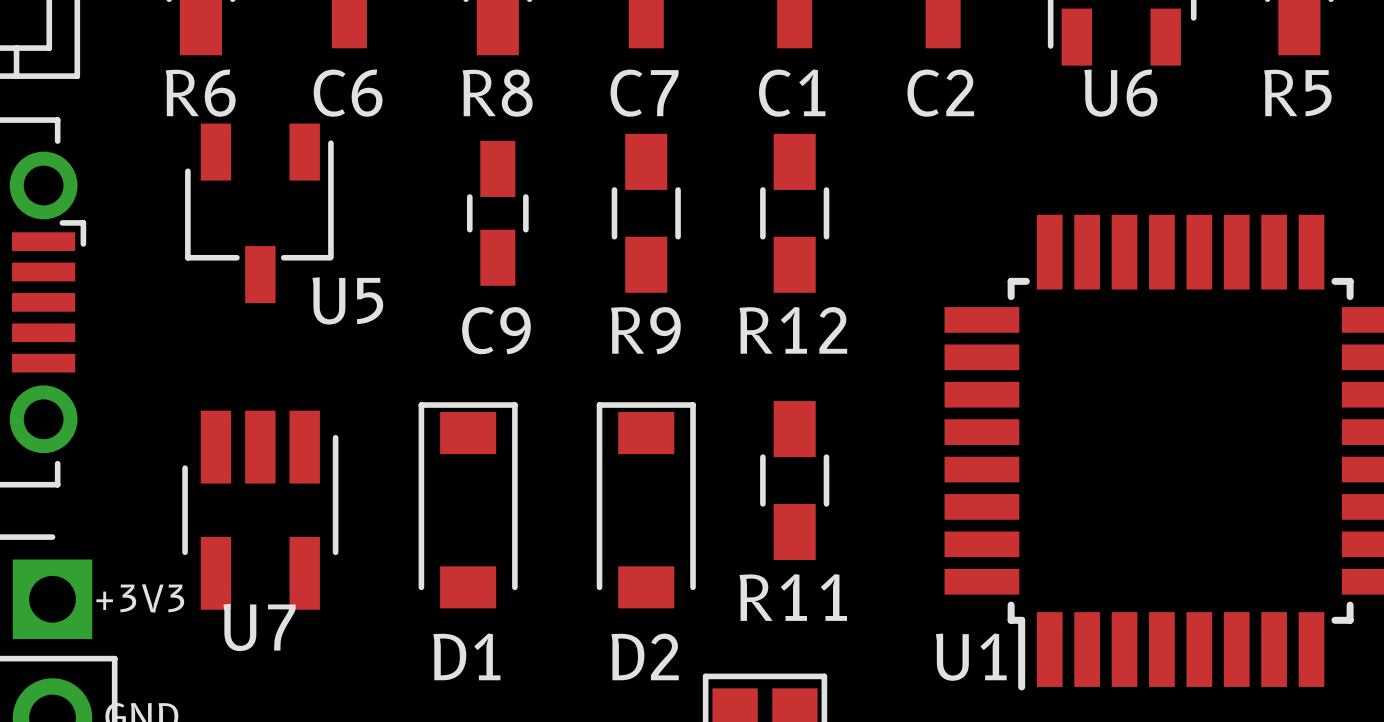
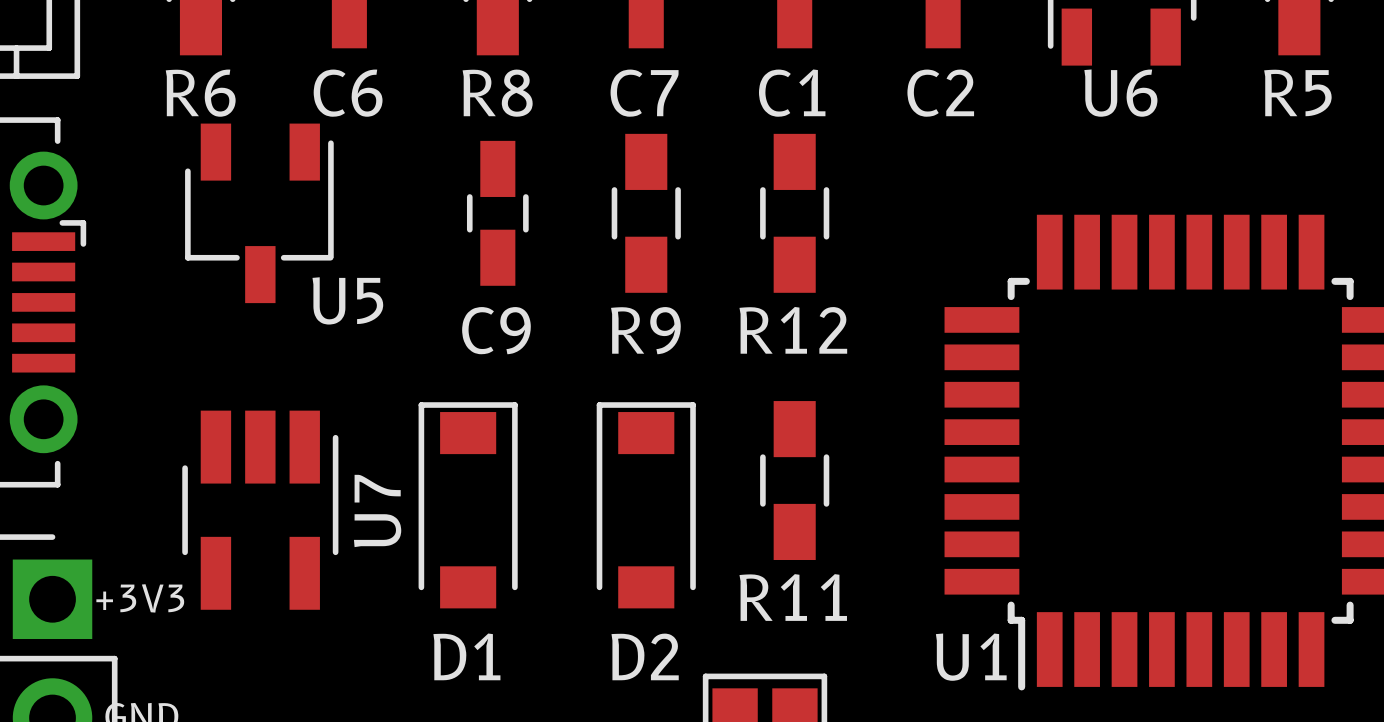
U7 name rotation: 0° (259, 627) -> 90° counterclockwise (377, 510)
U7 name position: U7 (259, 627) -> U7 (377, 510)

